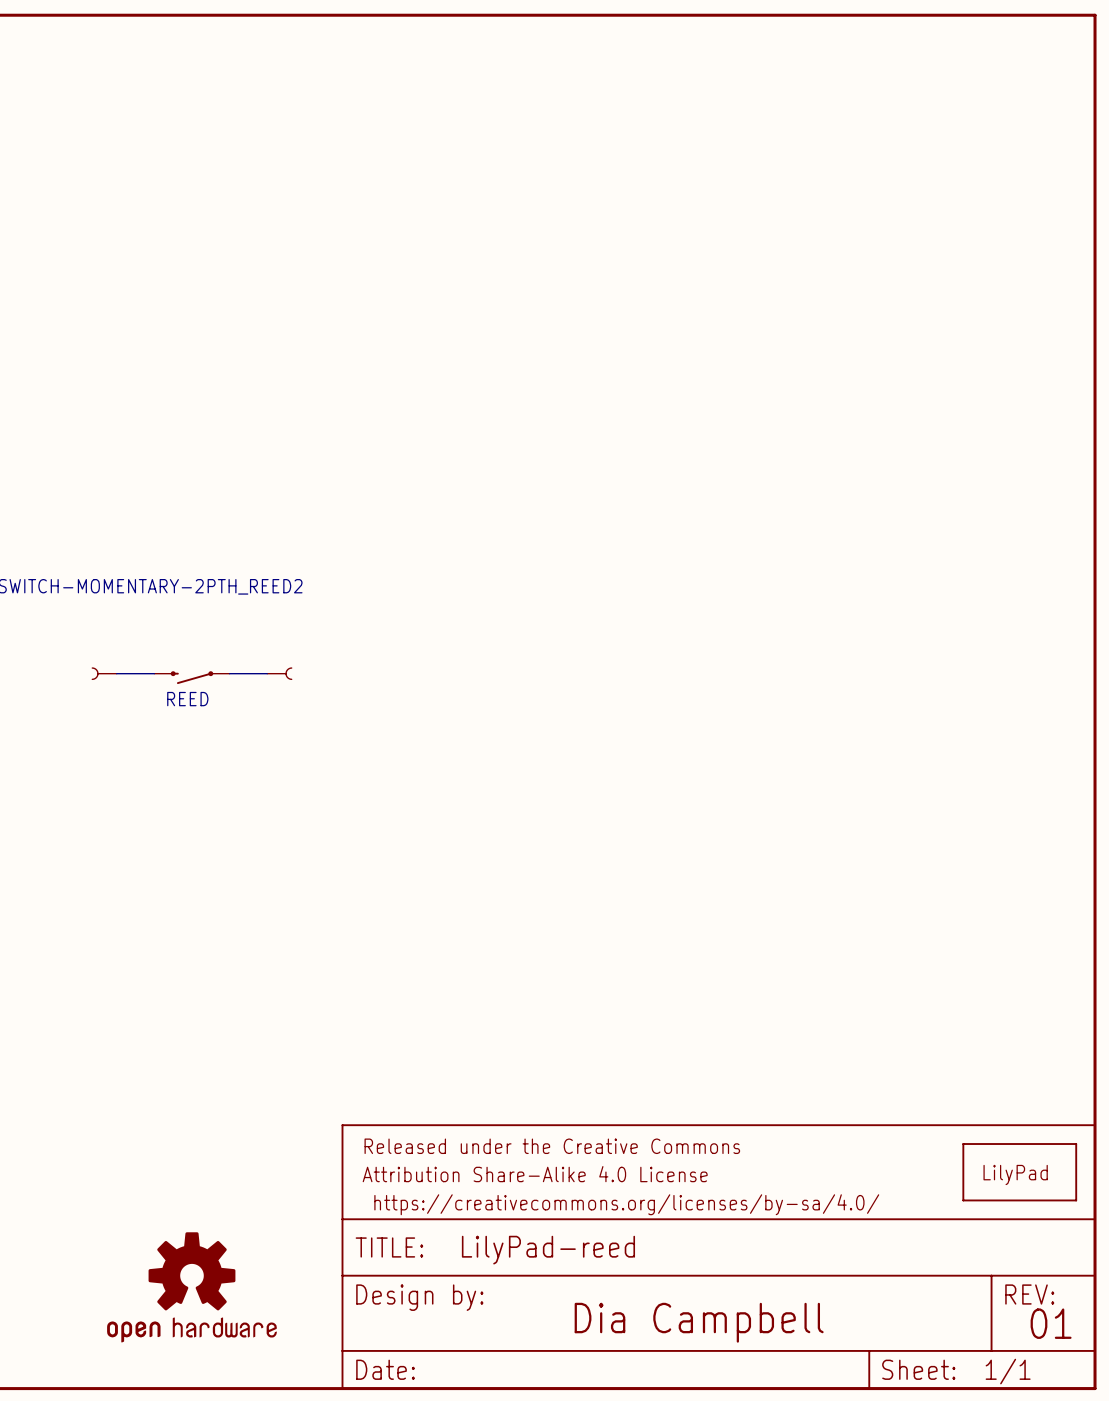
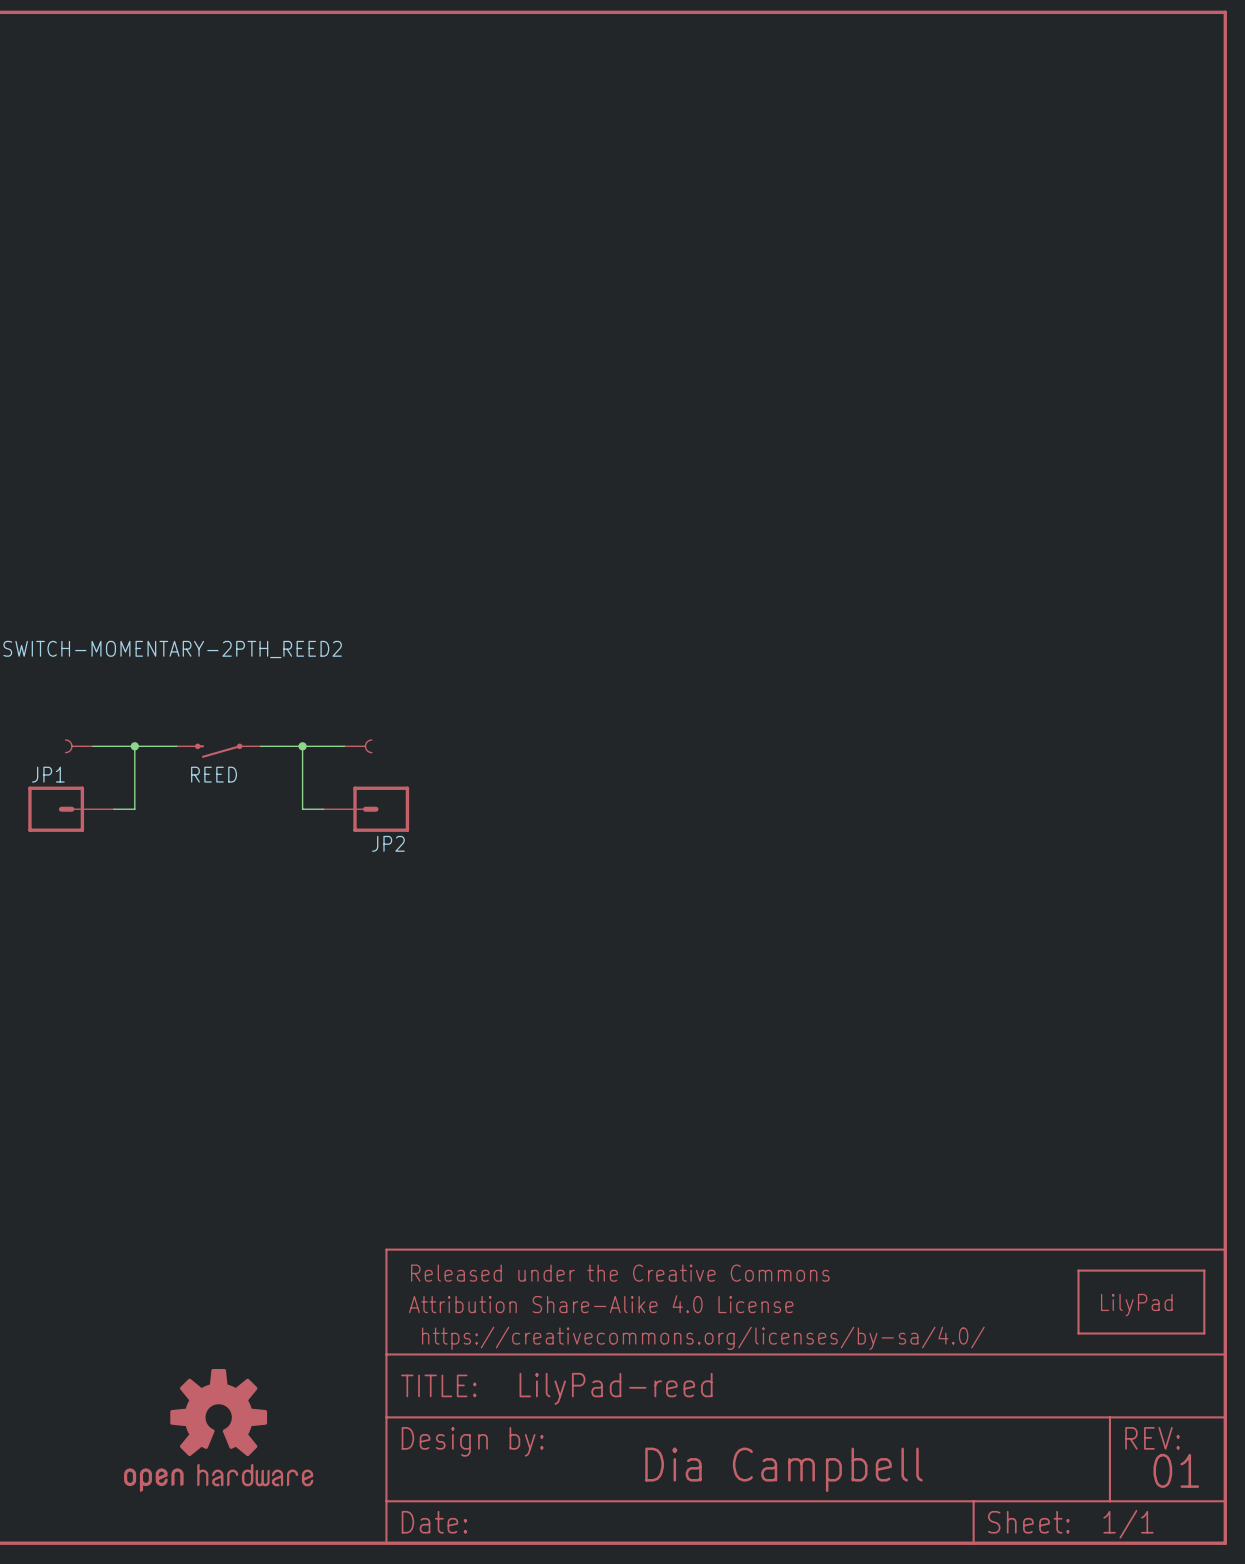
wire: none -> (92, 746) (134, 746) (134, 809) (113, 809)
part position: (104, 673) -> (79, 746)
junction: none -> (134, 746)
junction: none -> (302, 746)
part position: (279, 673) -> (358, 746)
wire: none -> (344, 746) (302, 746) (302, 809) (323, 809)
JP1: none -> (71, 809)
JP2: none -> (366, 809)

